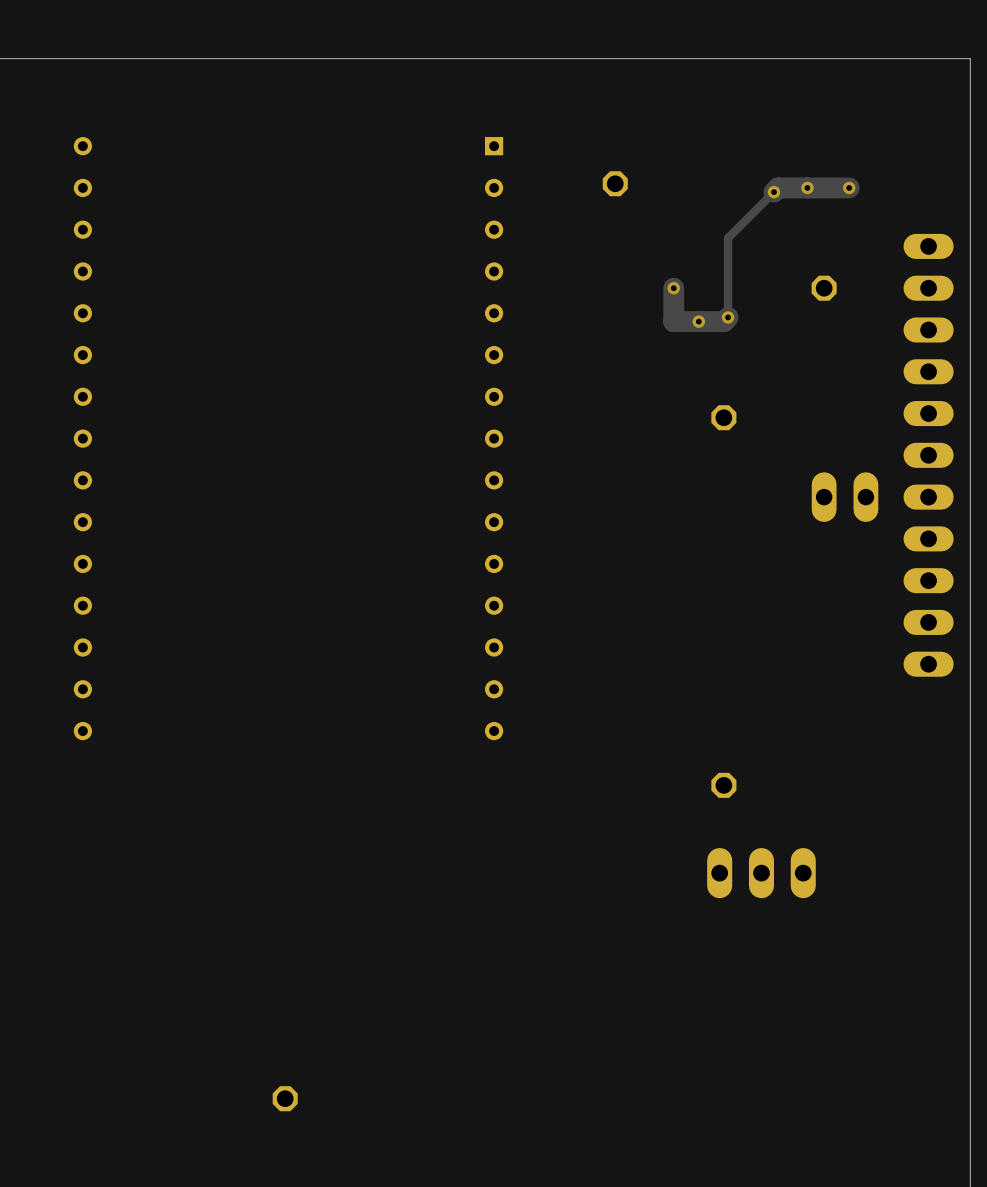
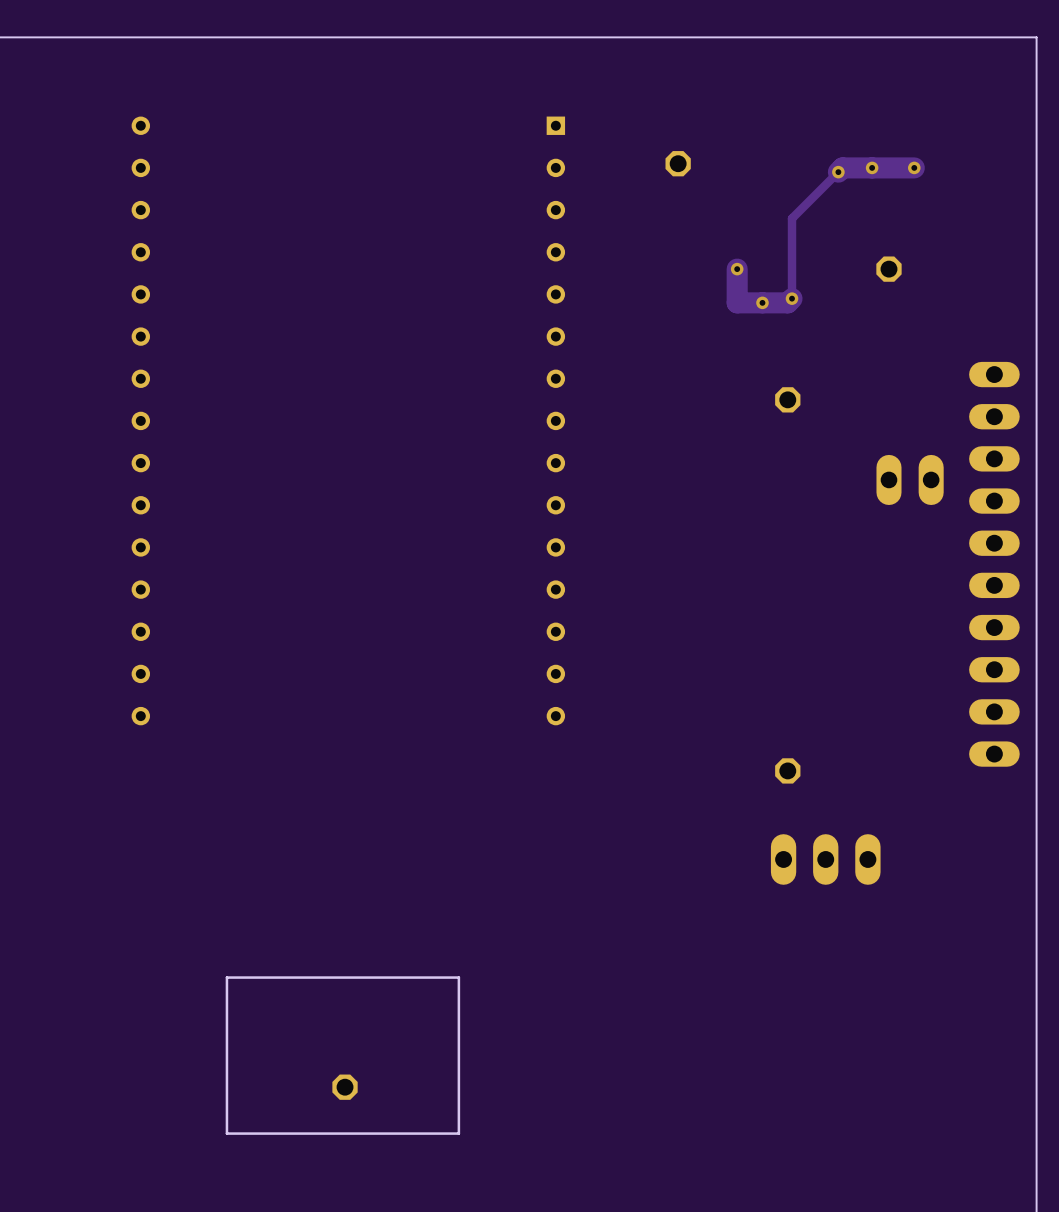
part: (928, 455) -> none
part: none -> (994, 564)
board edge: none -> (458, 977) (458, 1133) (226, 1133) (226, 977) (458, 977)

